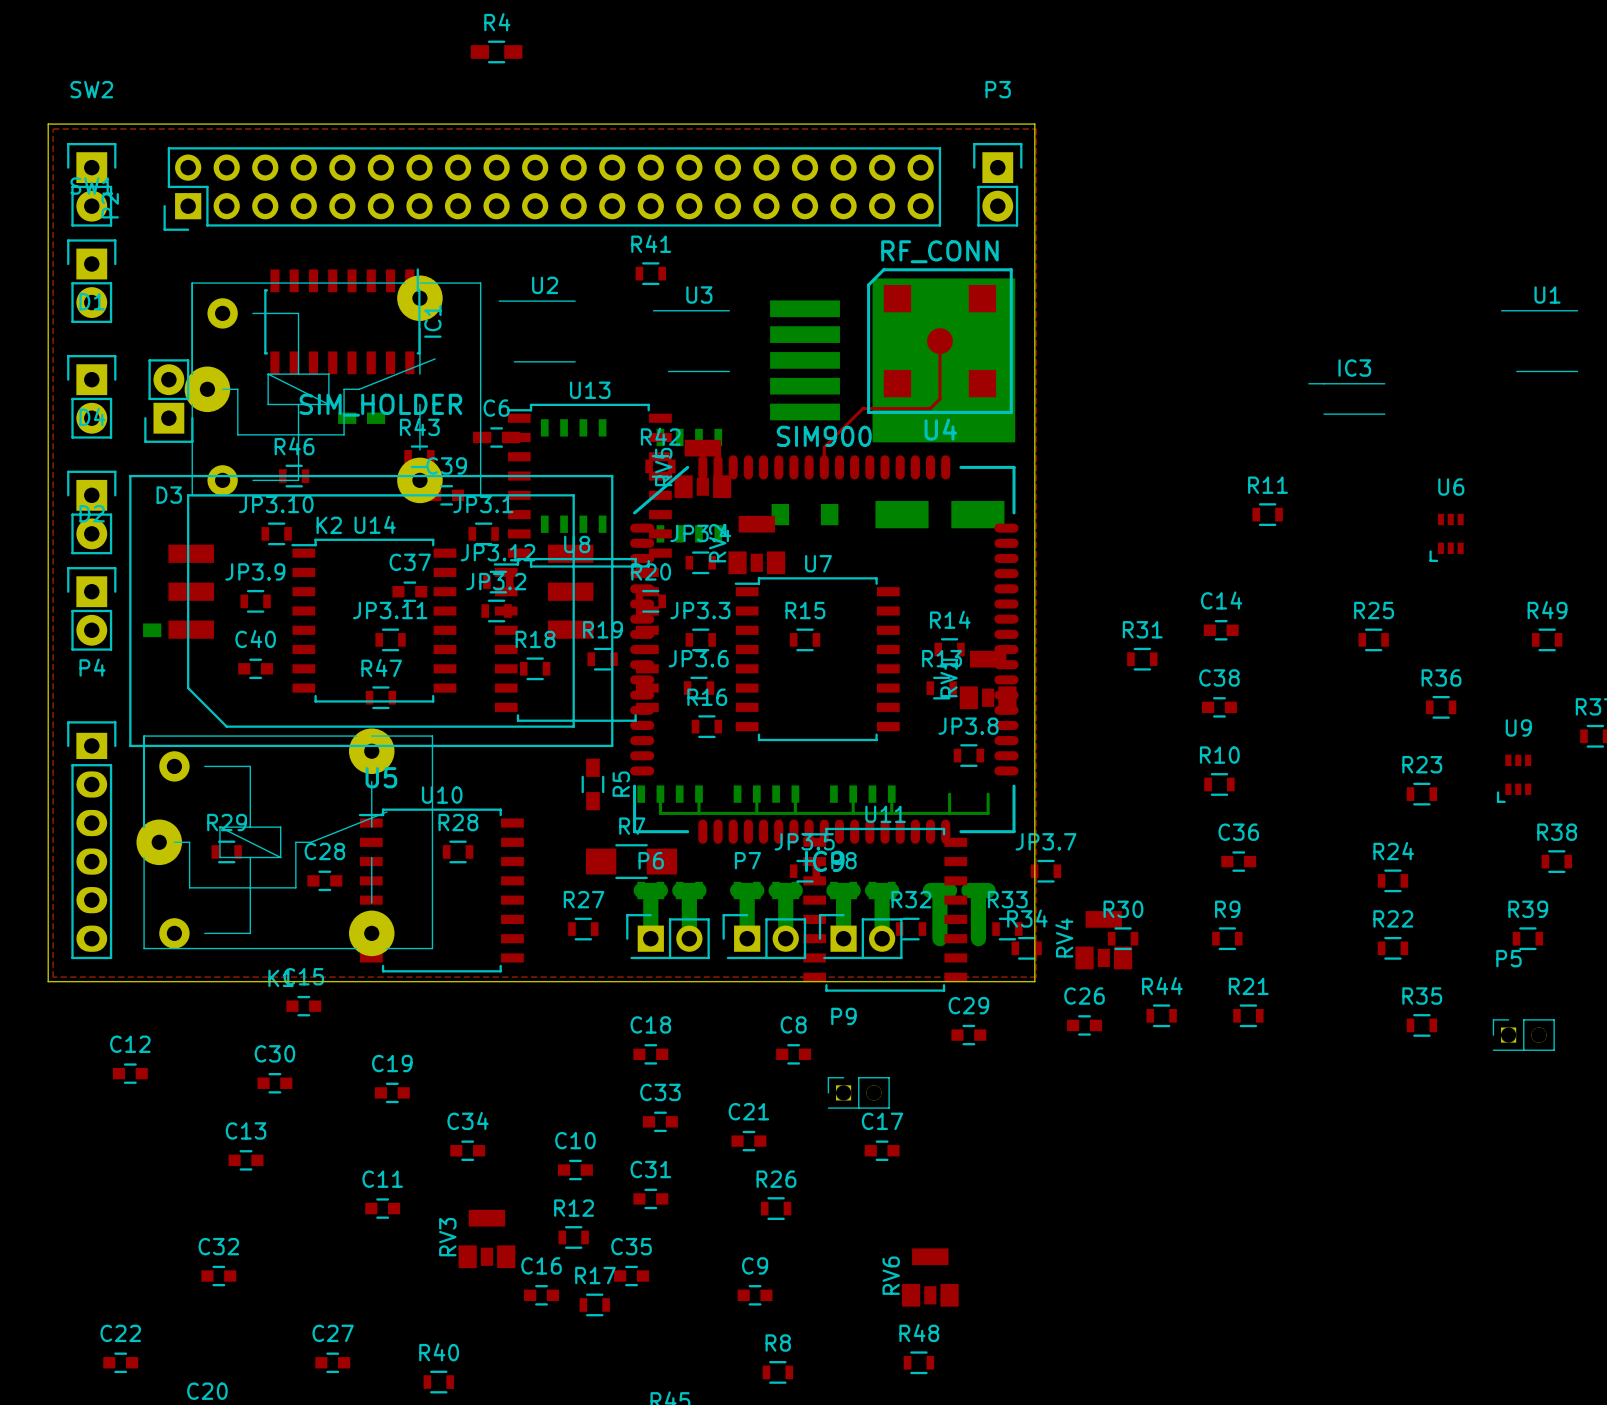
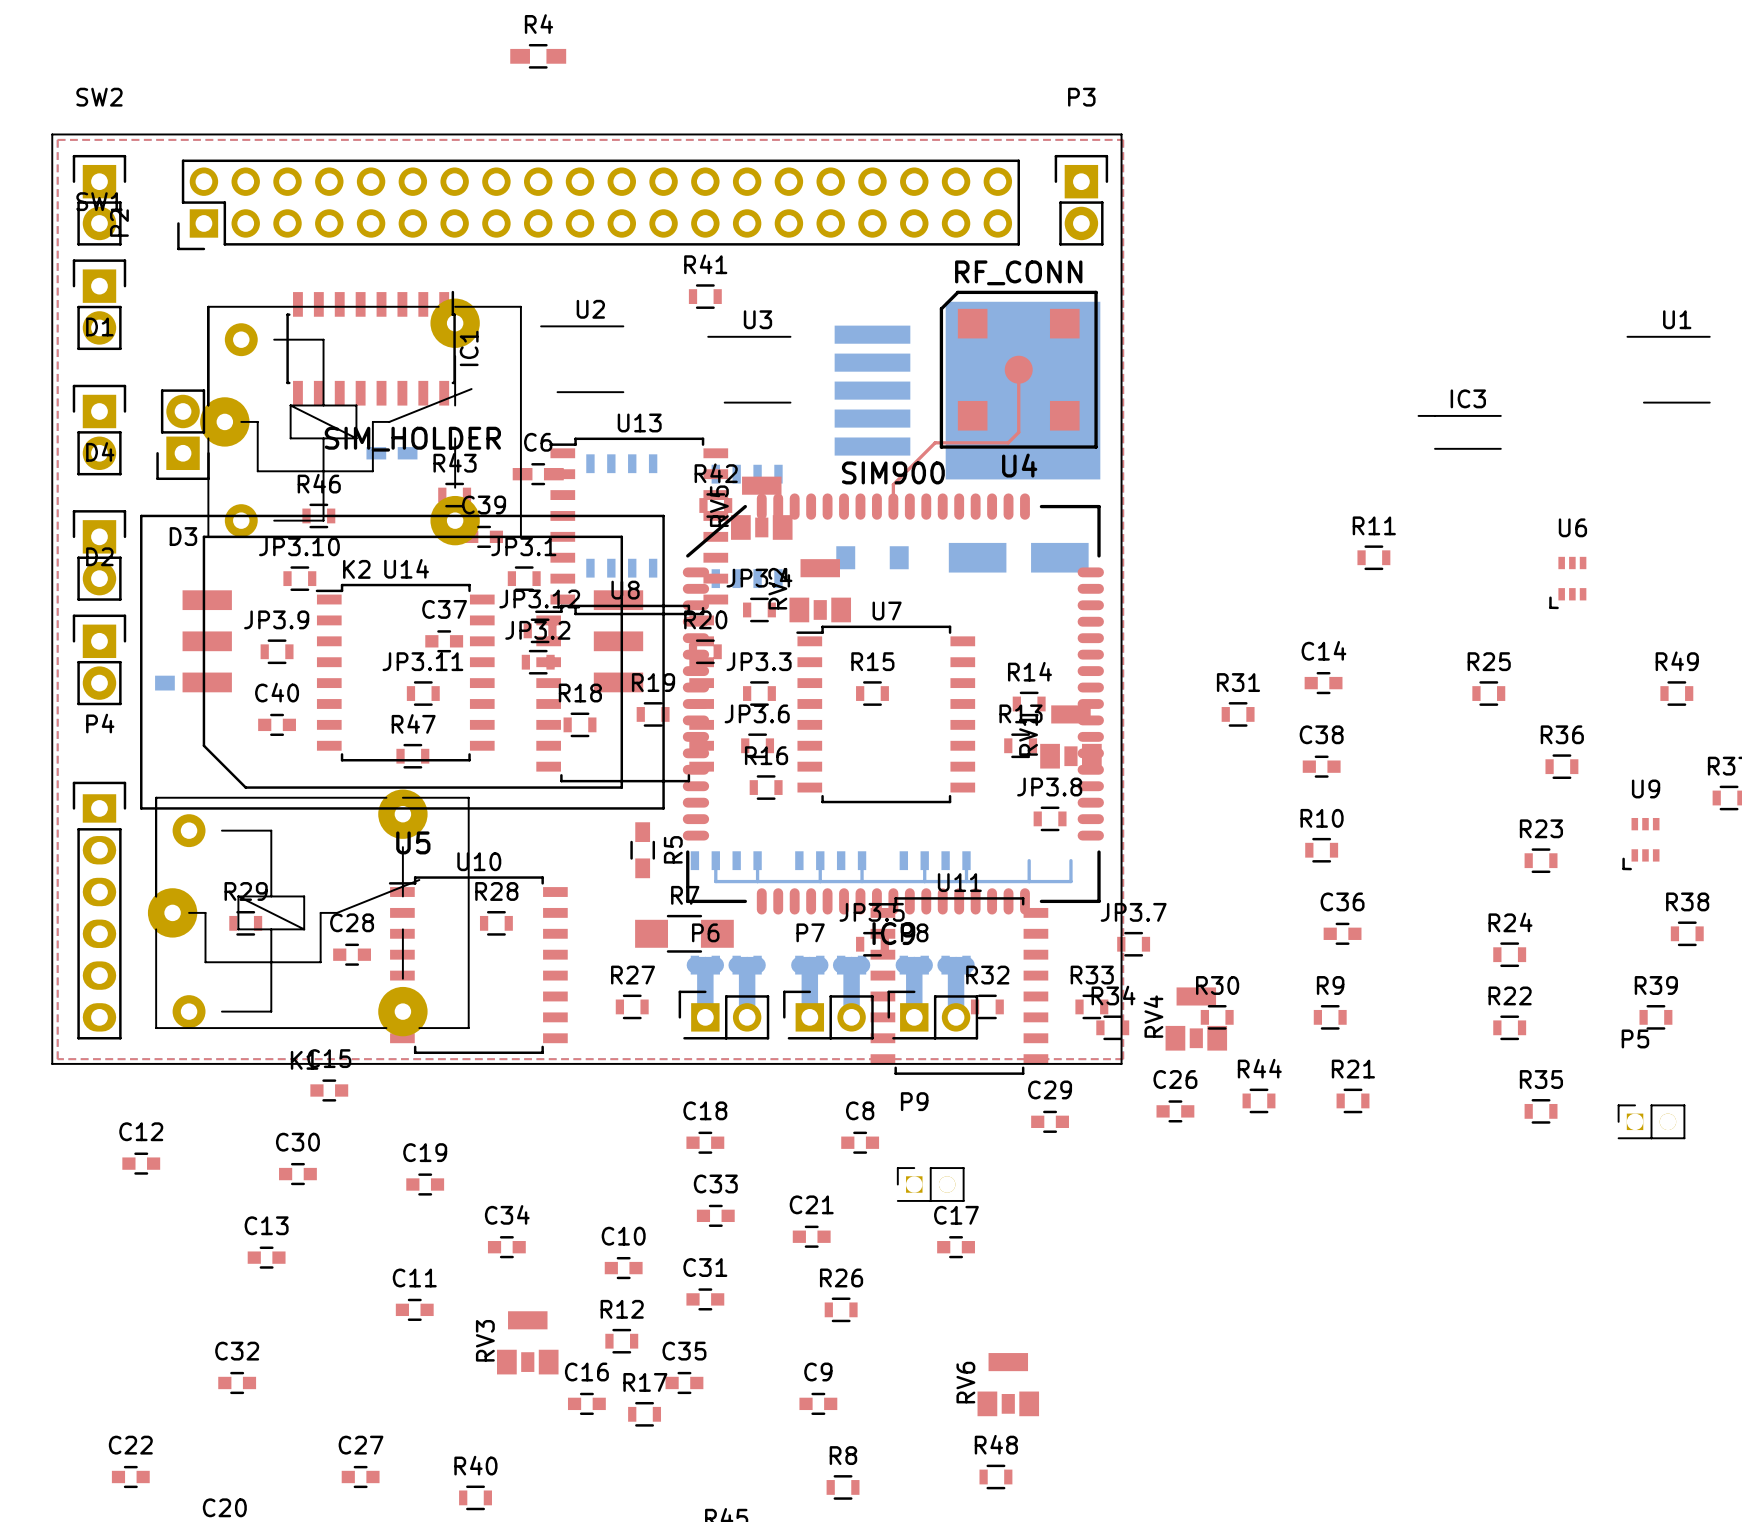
bottom track: (930, 890) (949, 890) -> none
bottom track: (939, 890) (939, 938) -> none
bottom track: (968, 890) (988, 890) -> none
bottom track: (978, 890) (978, 938) -> none

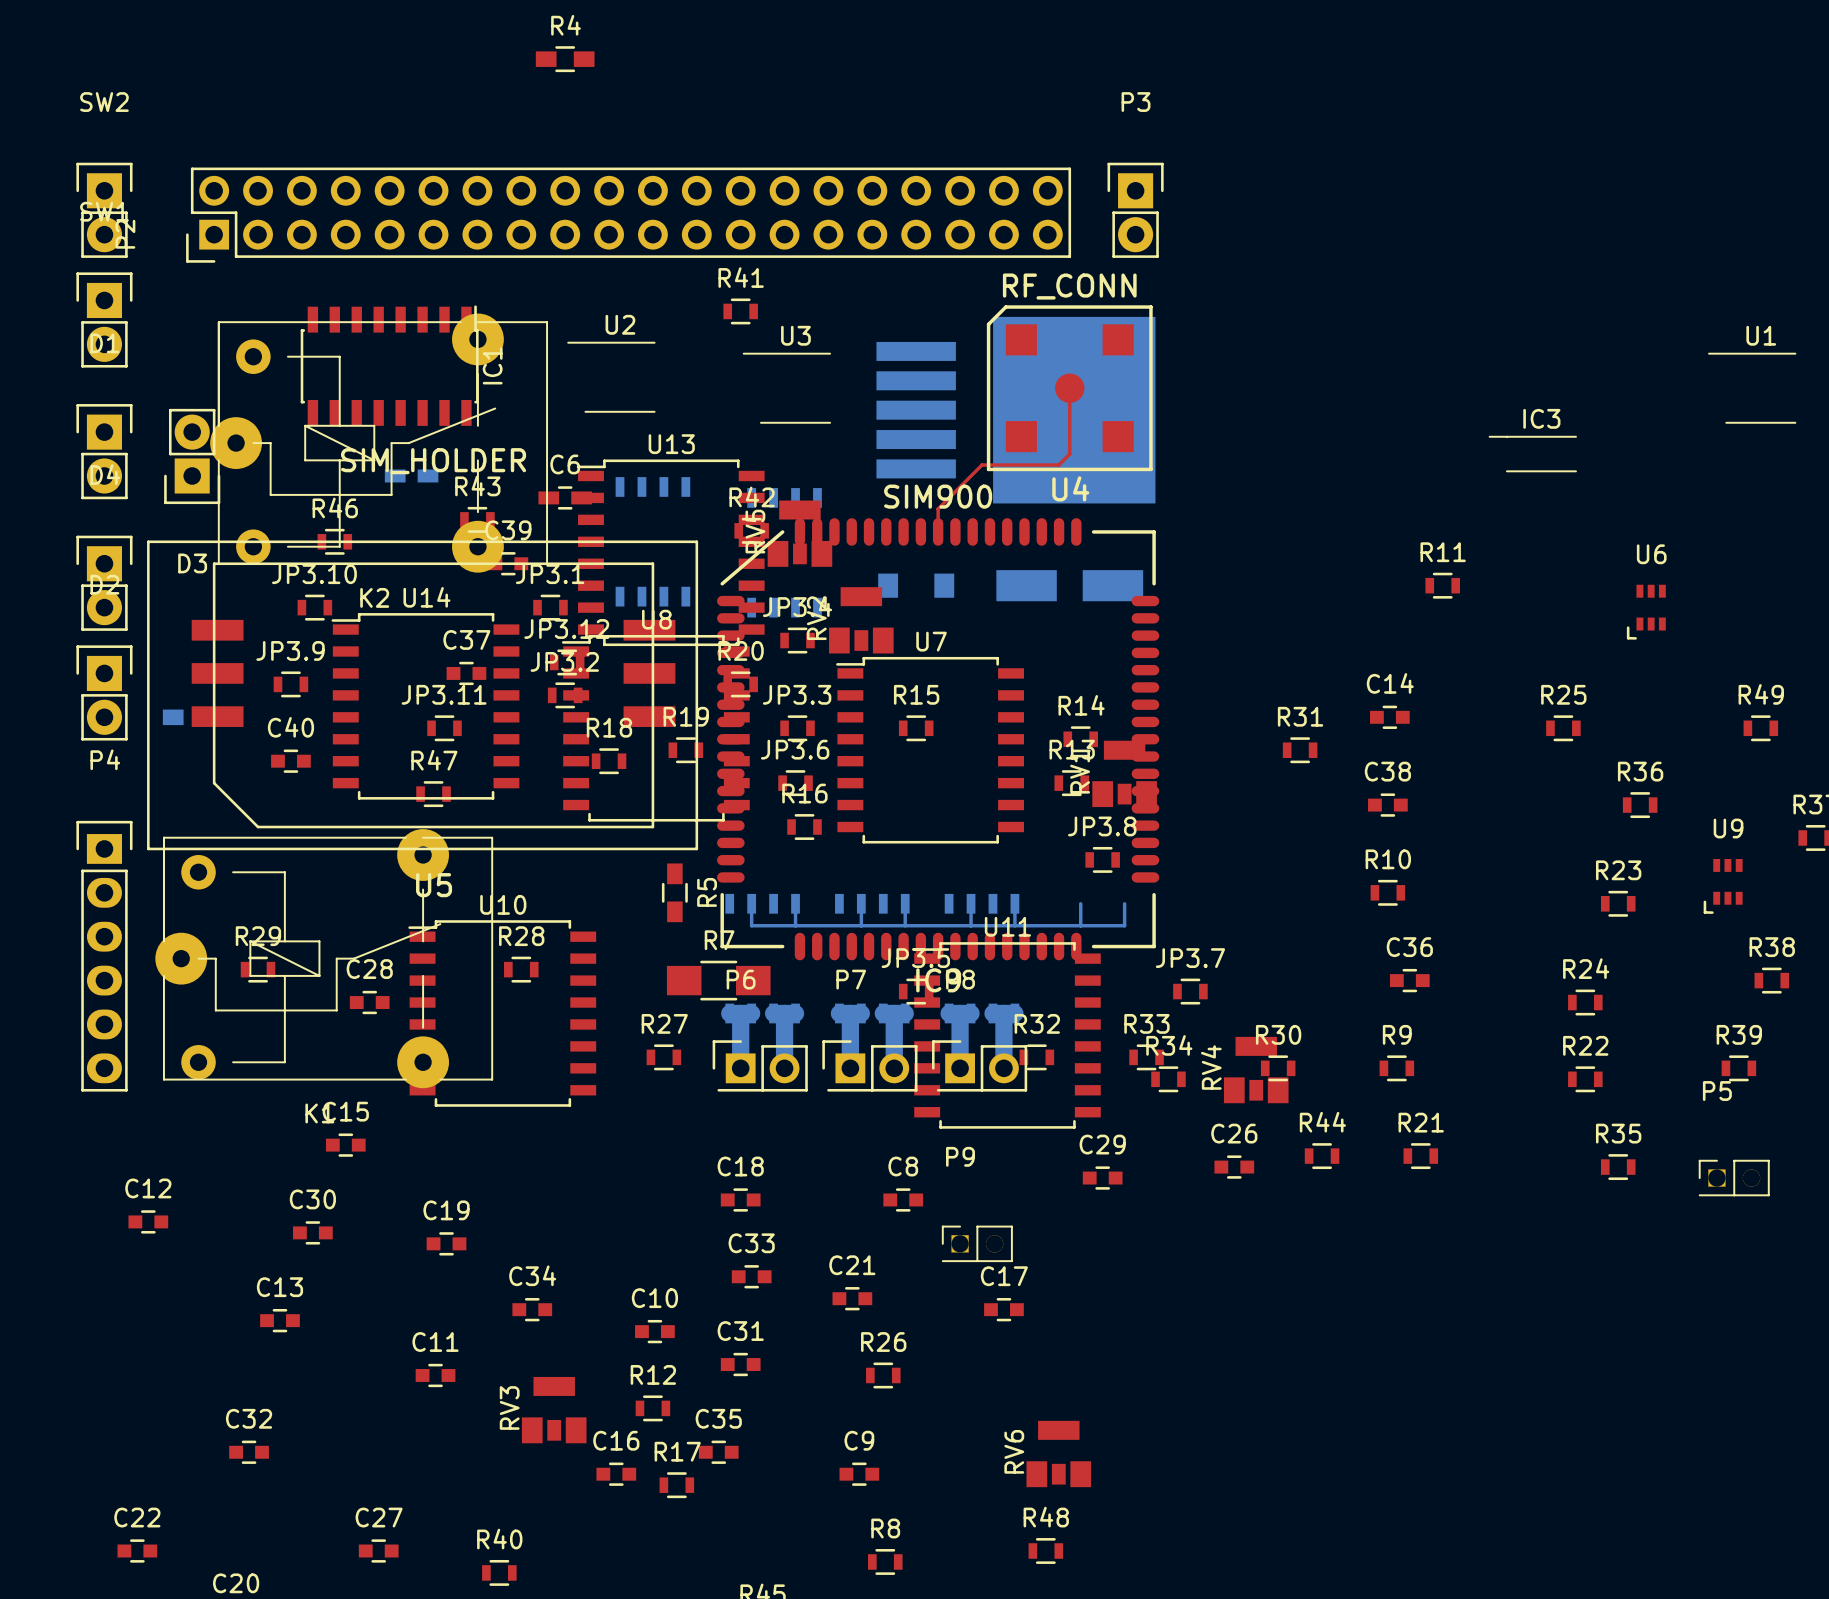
board edge: (52, 134) (52, 1063) (1121, 1063) (1121, 134) (52, 134) -> none
top zone outline: (57, 139) (57, 1059) (1123, 1059) (1123, 139) (57, 139) -> none

